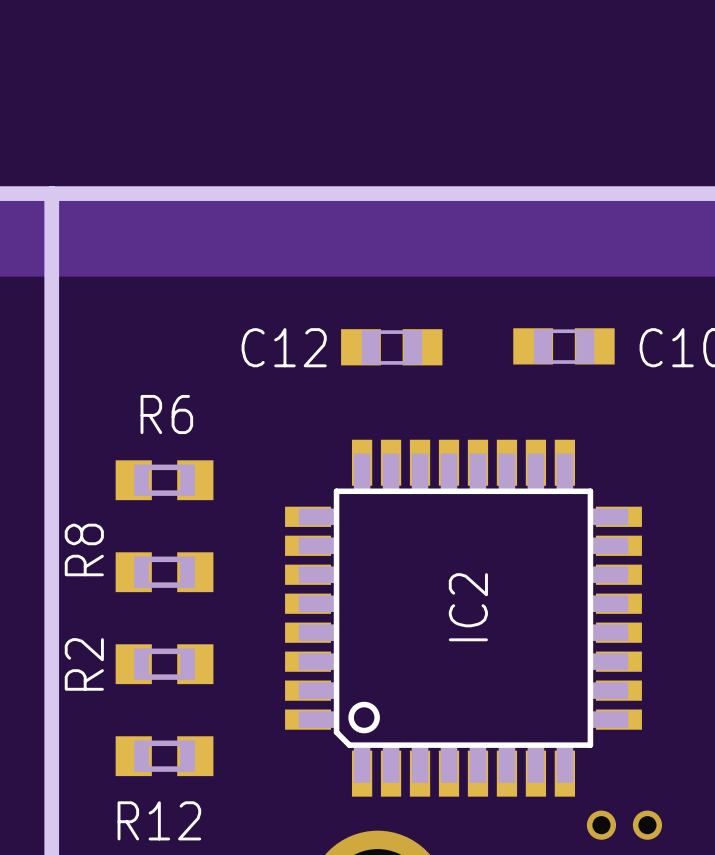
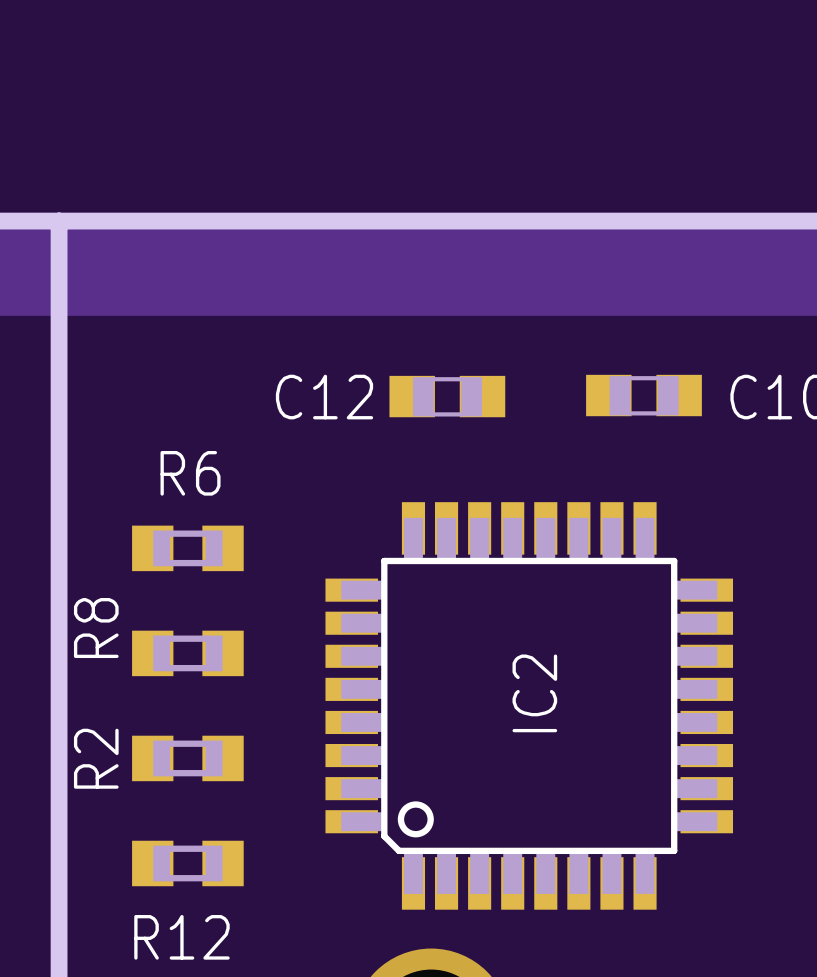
via: (601, 825) -> none
via: (647, 825) -> none

